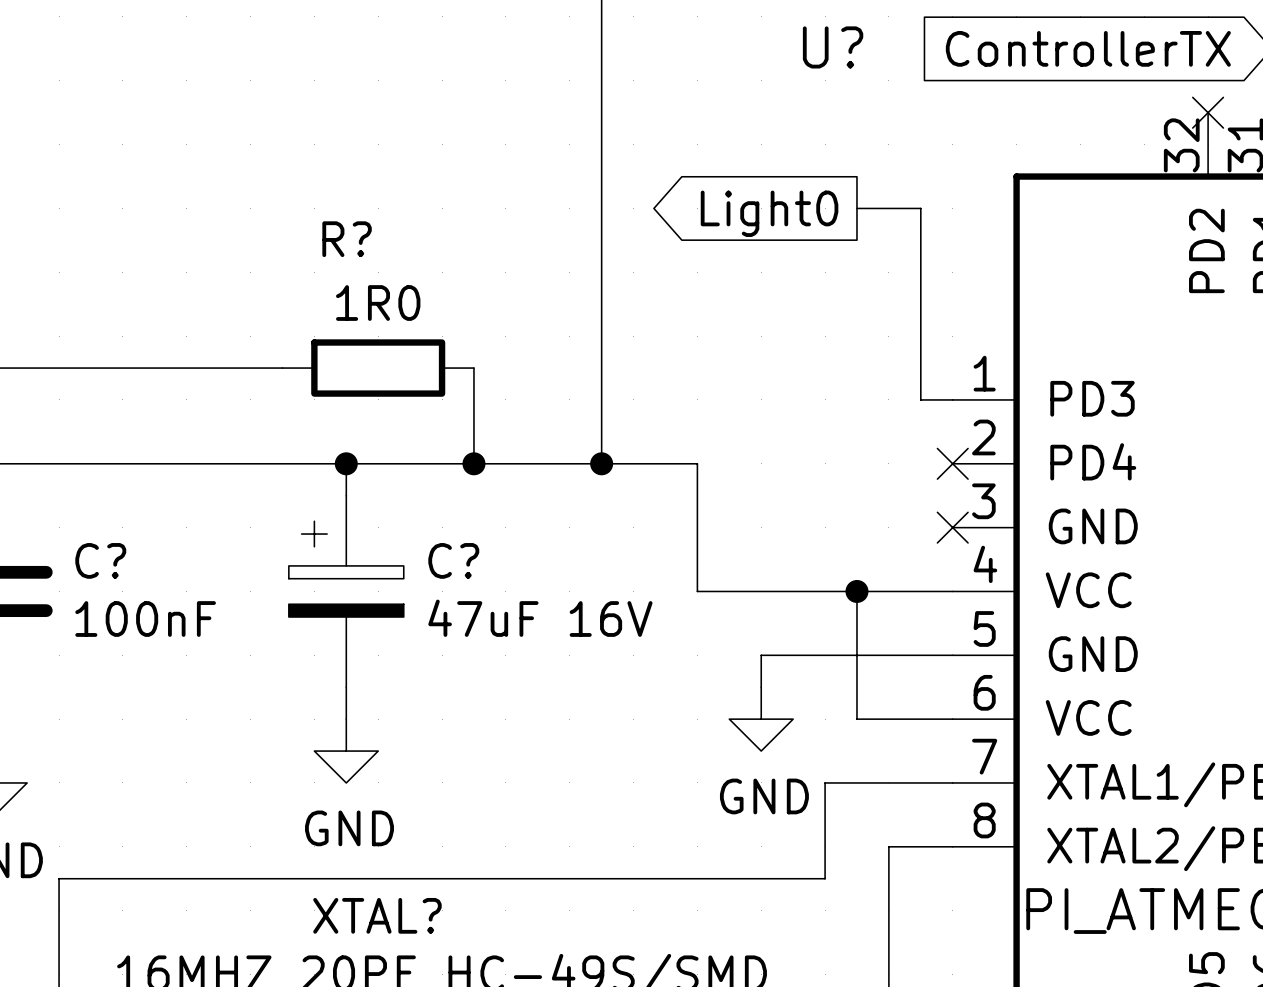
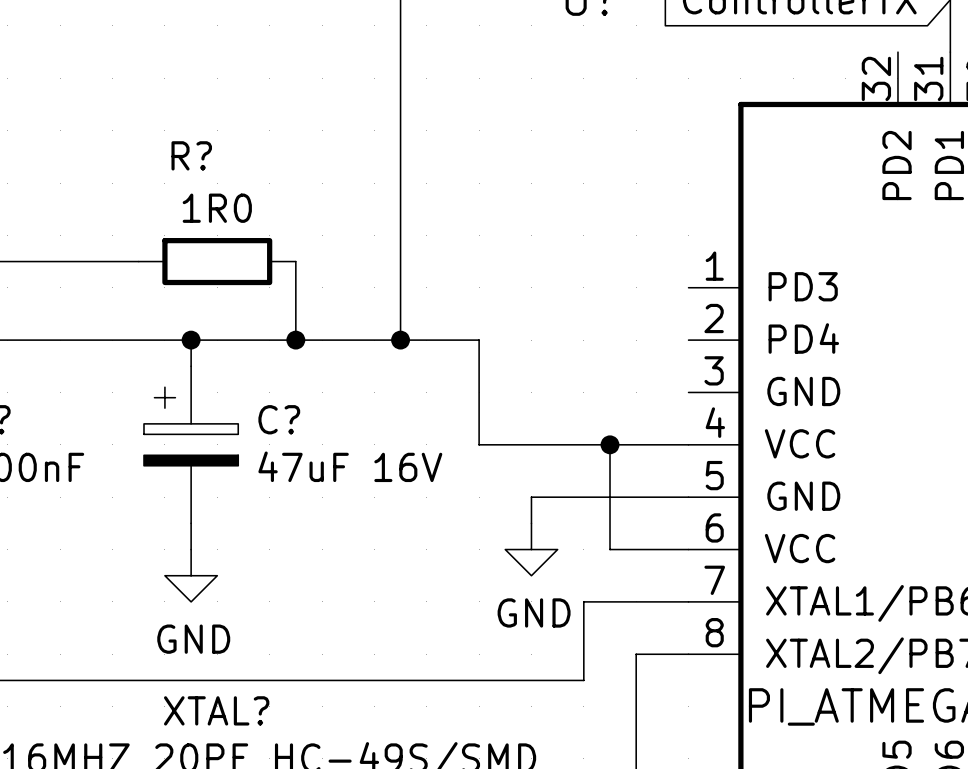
no-connect mark: (1208, 112) -> none
wire: (856, 208) (920, 208) (920, 399) (952, 399) -> none
global label: Light0 (769, 213) -> none
no-connect mark: (952, 463) -> none
no-connect mark: (952, 527) -> none

